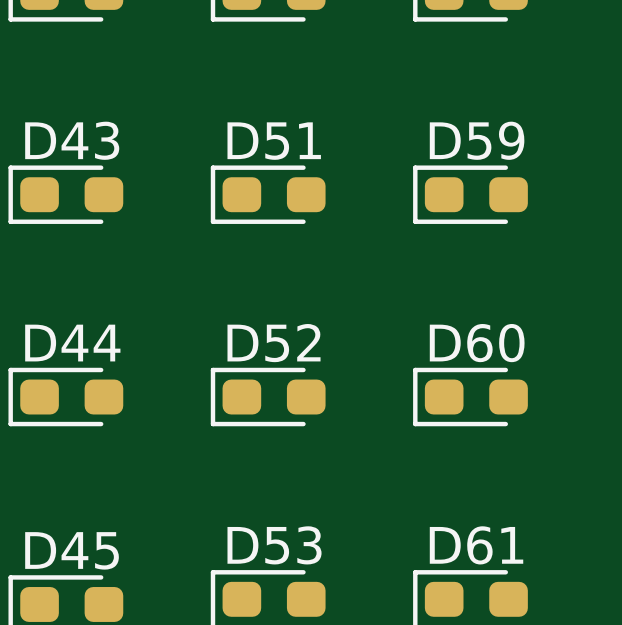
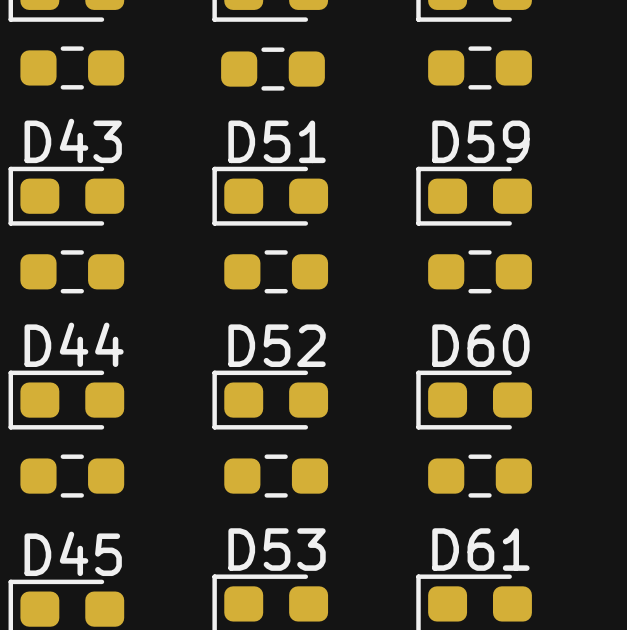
part: none -> (72, 67)
part: none -> (480, 67)
part: none -> (273, 69)
part: none -> (72, 271)
part: none -> (276, 271)
part: none -> (480, 271)
part: none -> (72, 476)
part: none -> (276, 476)
part: none -> (480, 476)

